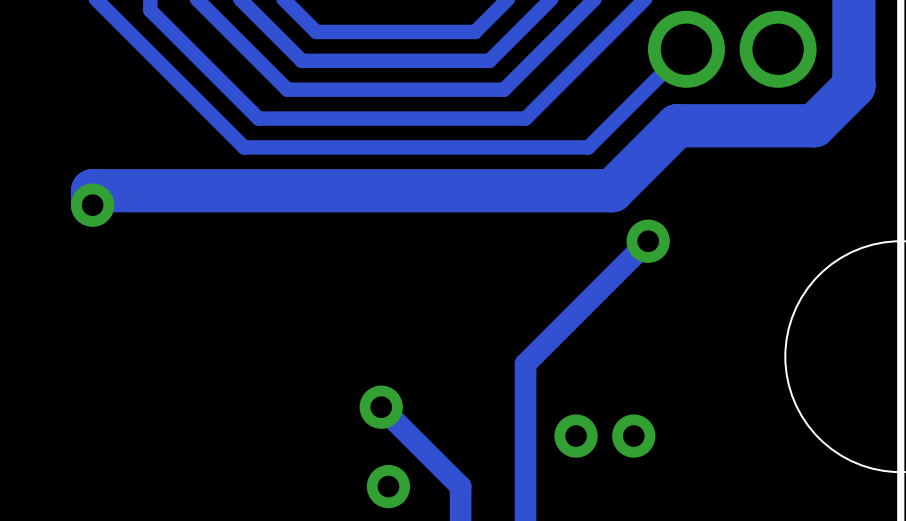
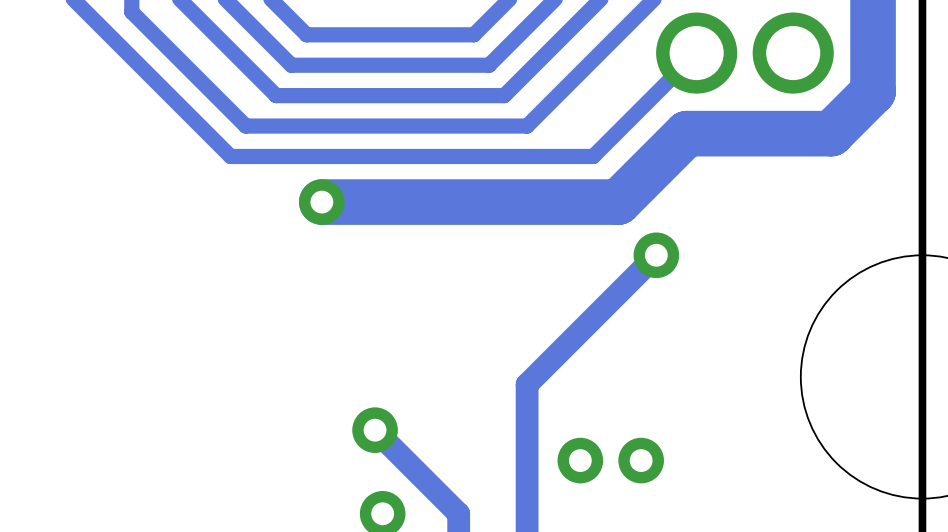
track: (330, 190) (92, 190) (92, 205) -> none
via: none -> (321, 202)
via: (92, 205) -> none

